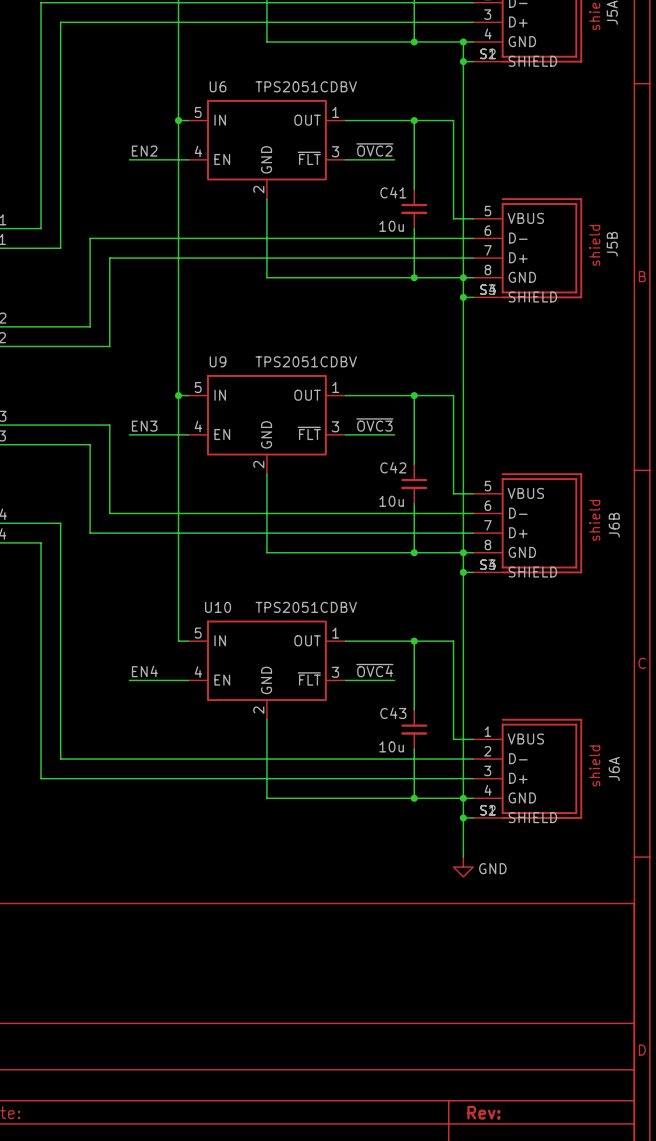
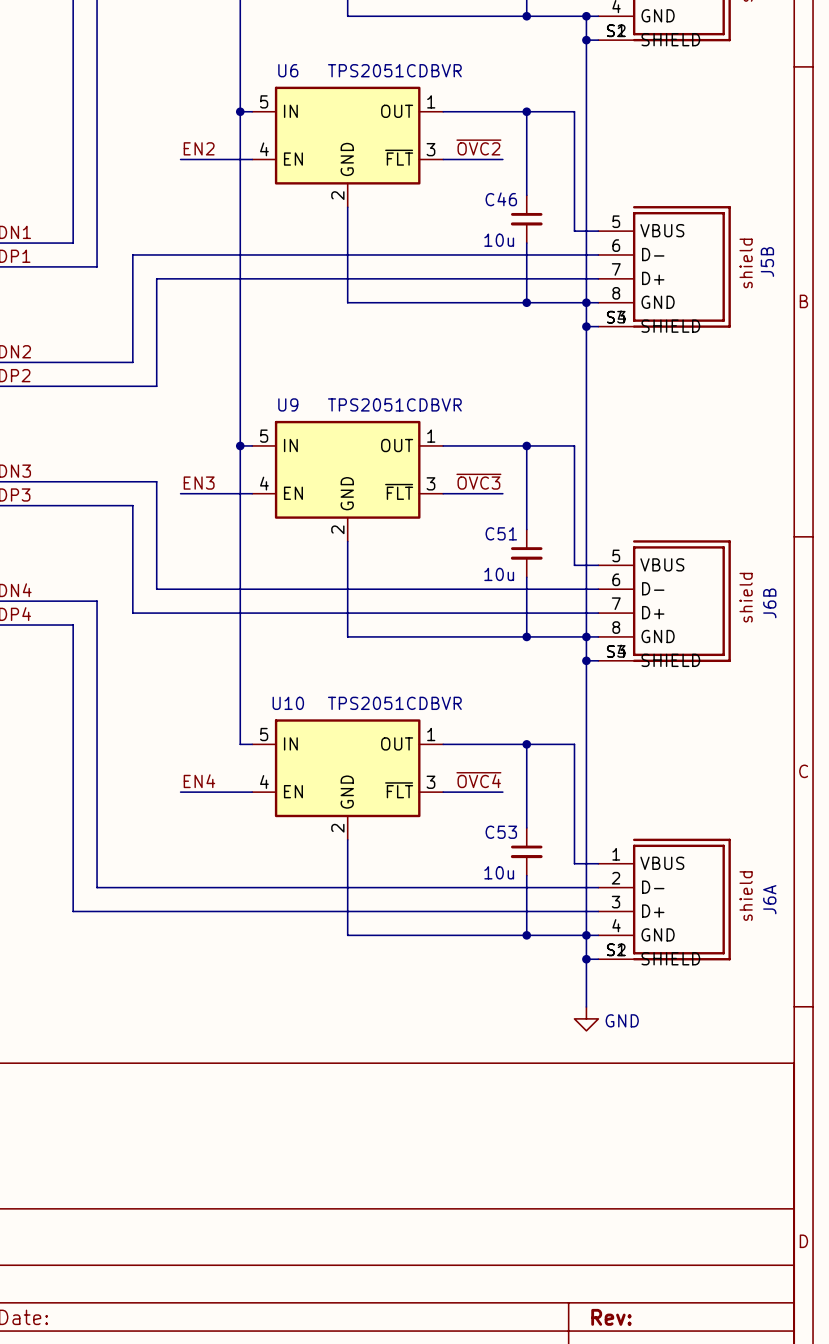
U6 value: TPS2051CDBV (306, 86) -> TPS2051CDBVR (394, 70)
C41 name: C41 (393, 192) -> C46 (501, 199)
U9 value: TPS2051CDBV (306, 361) -> TPS2051CDBVR (394, 404)
C42 name: C42 (393, 467) -> C51 (501, 533)
U10 value: TPS2051CDBV (306, 607) -> TPS2051CDBVR (394, 703)
C43 name: C43 (393, 713) -> C53 (501, 832)

